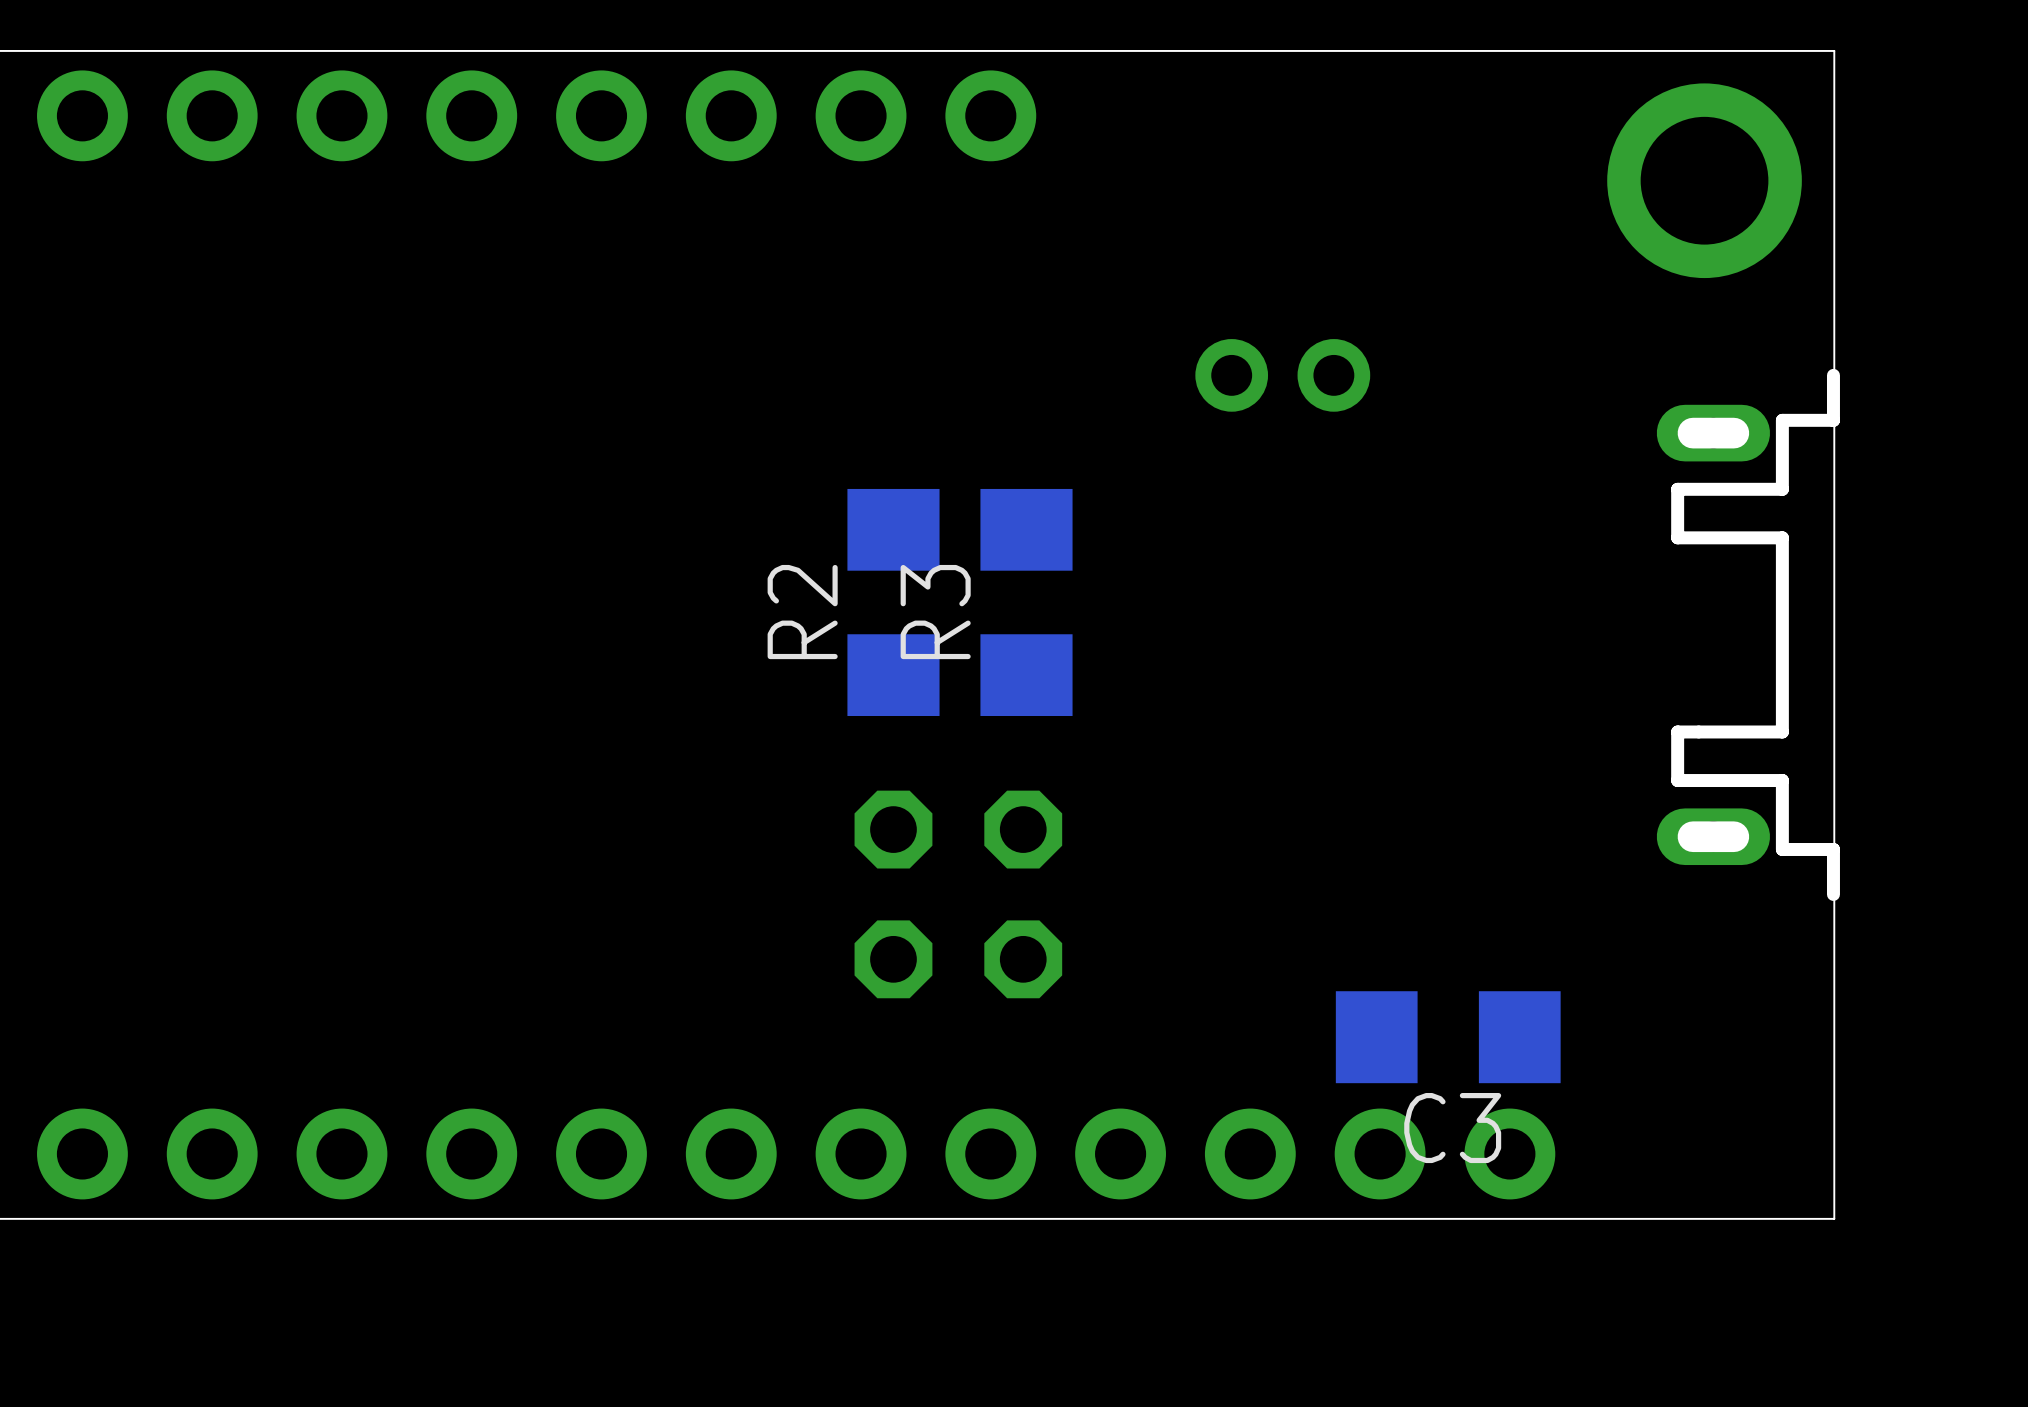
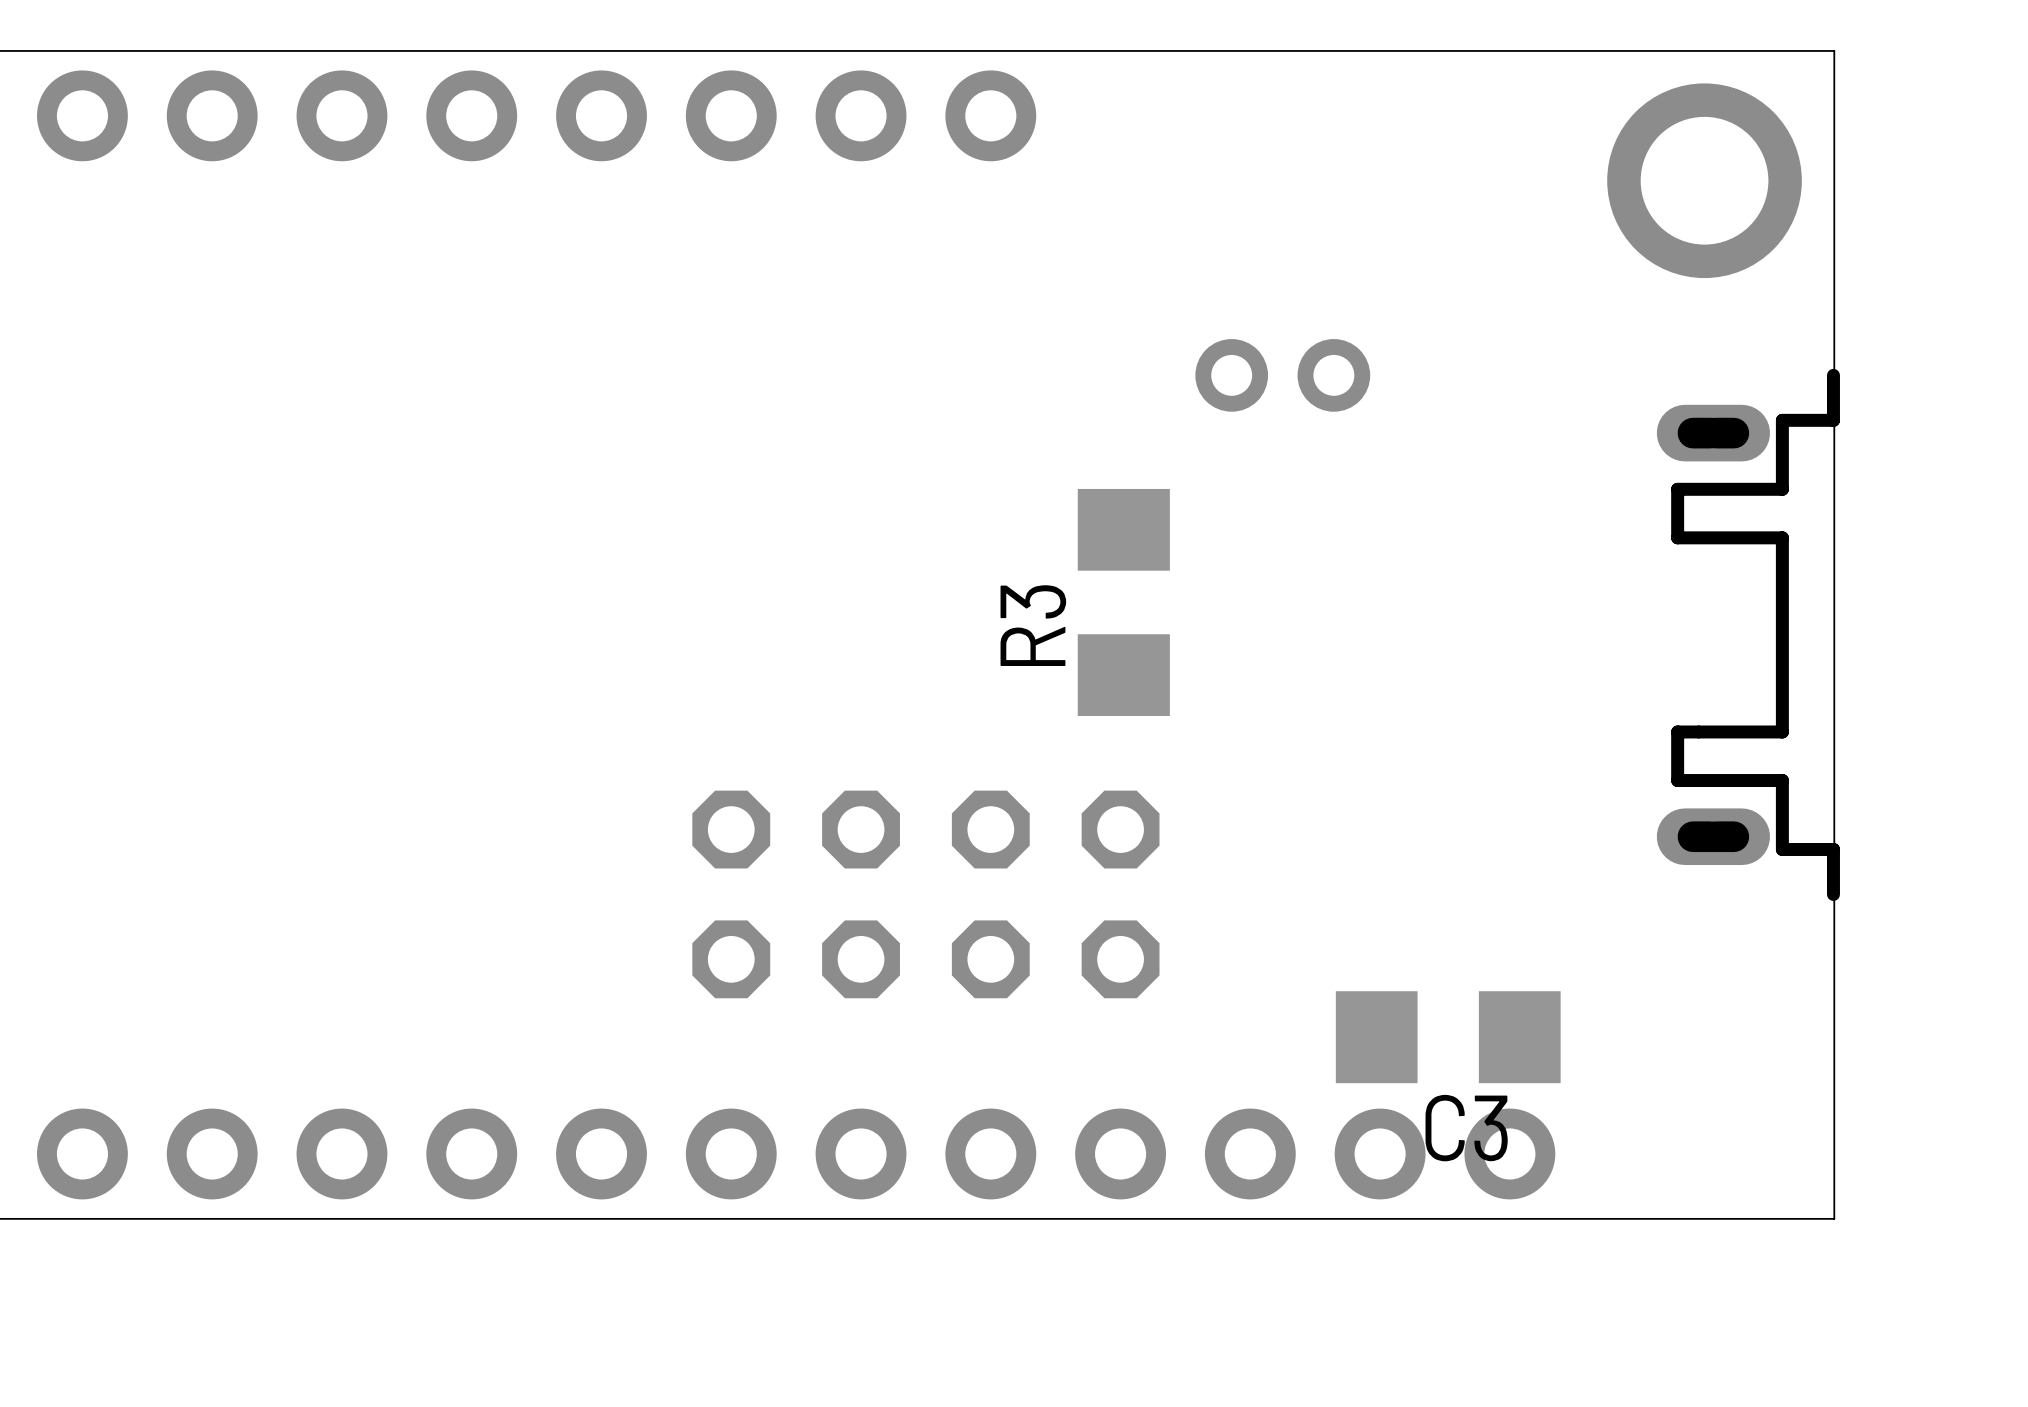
R2: (893, 602) -> none
R3 position: (1026, 602) -> (1123, 602)
part: none -> (731, 894)
part position: (893, 894) -> (861, 894)
part position: (1023, 894) -> (990, 894)
part: none -> (1120, 894)

